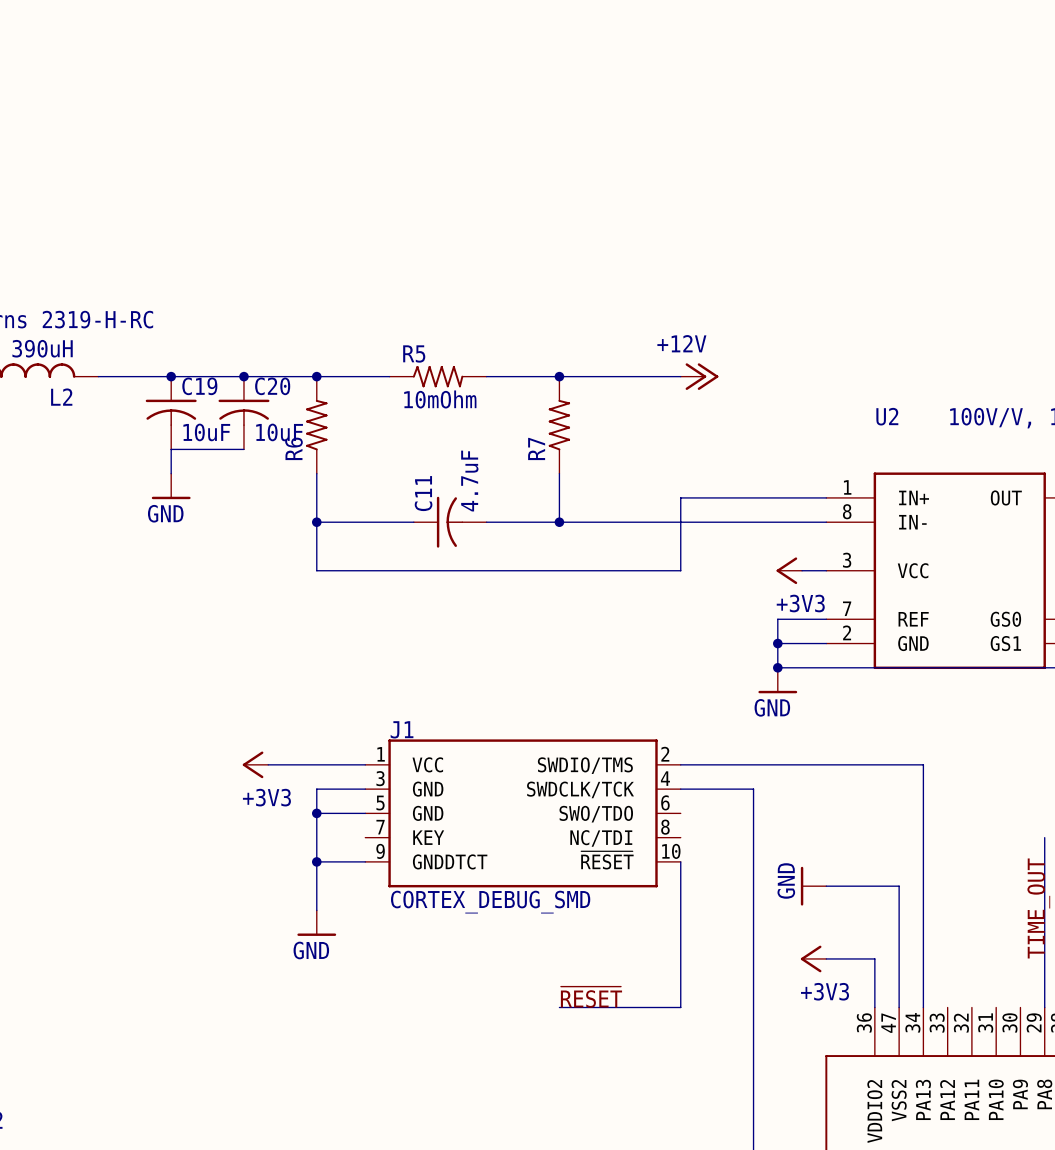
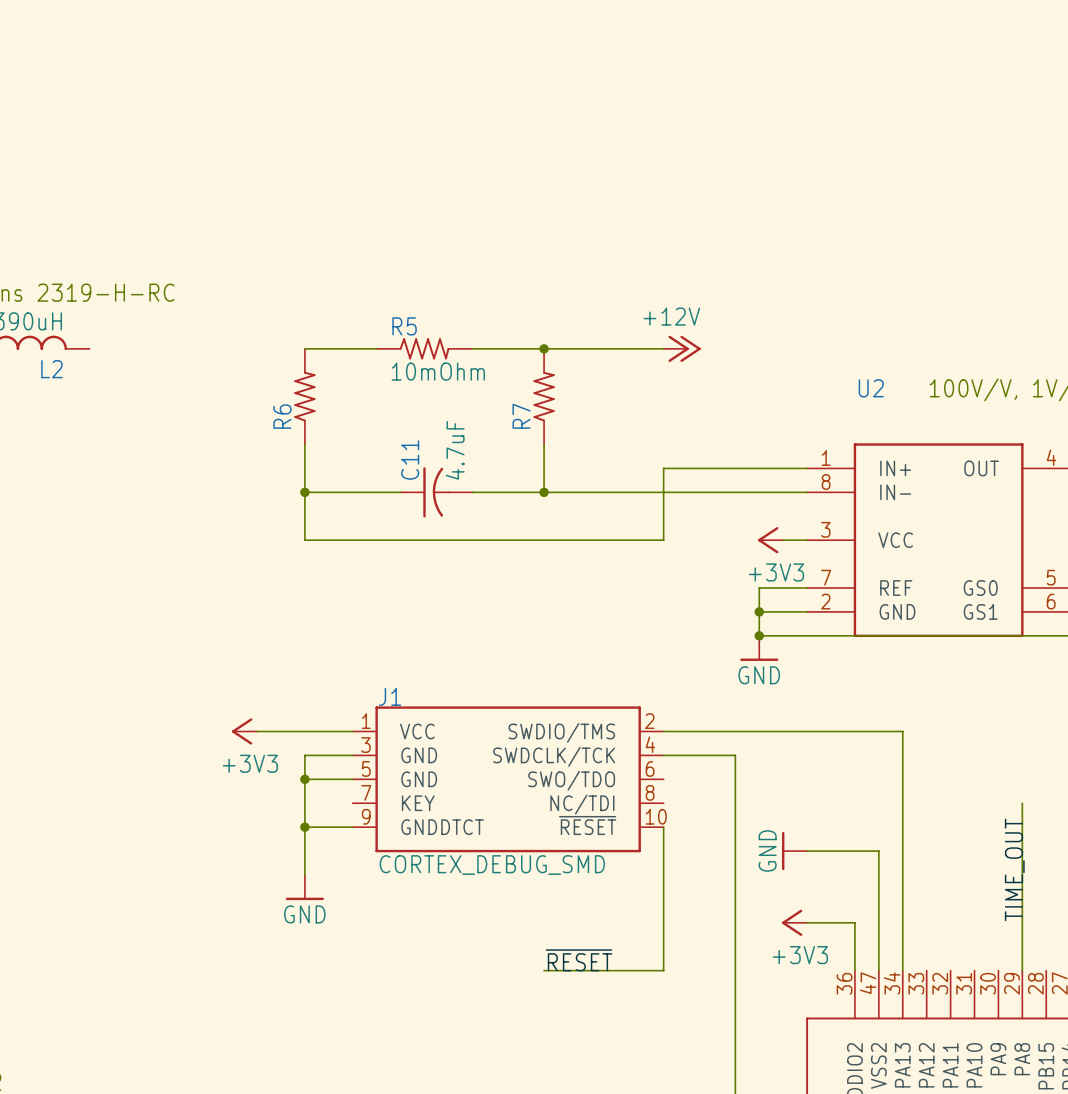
wire: (98, 376) (316, 376) -> none
junction: (171, 376) -> none
junction: (243, 376) -> none
junction: (316, 376) -> none
C19: 10uF (171, 413) -> none
C20: 10uF (243, 413) -> none
wire: (243, 449) (171, 449) (171, 473) -> none
power symbol: GND (171, 486) -> none

